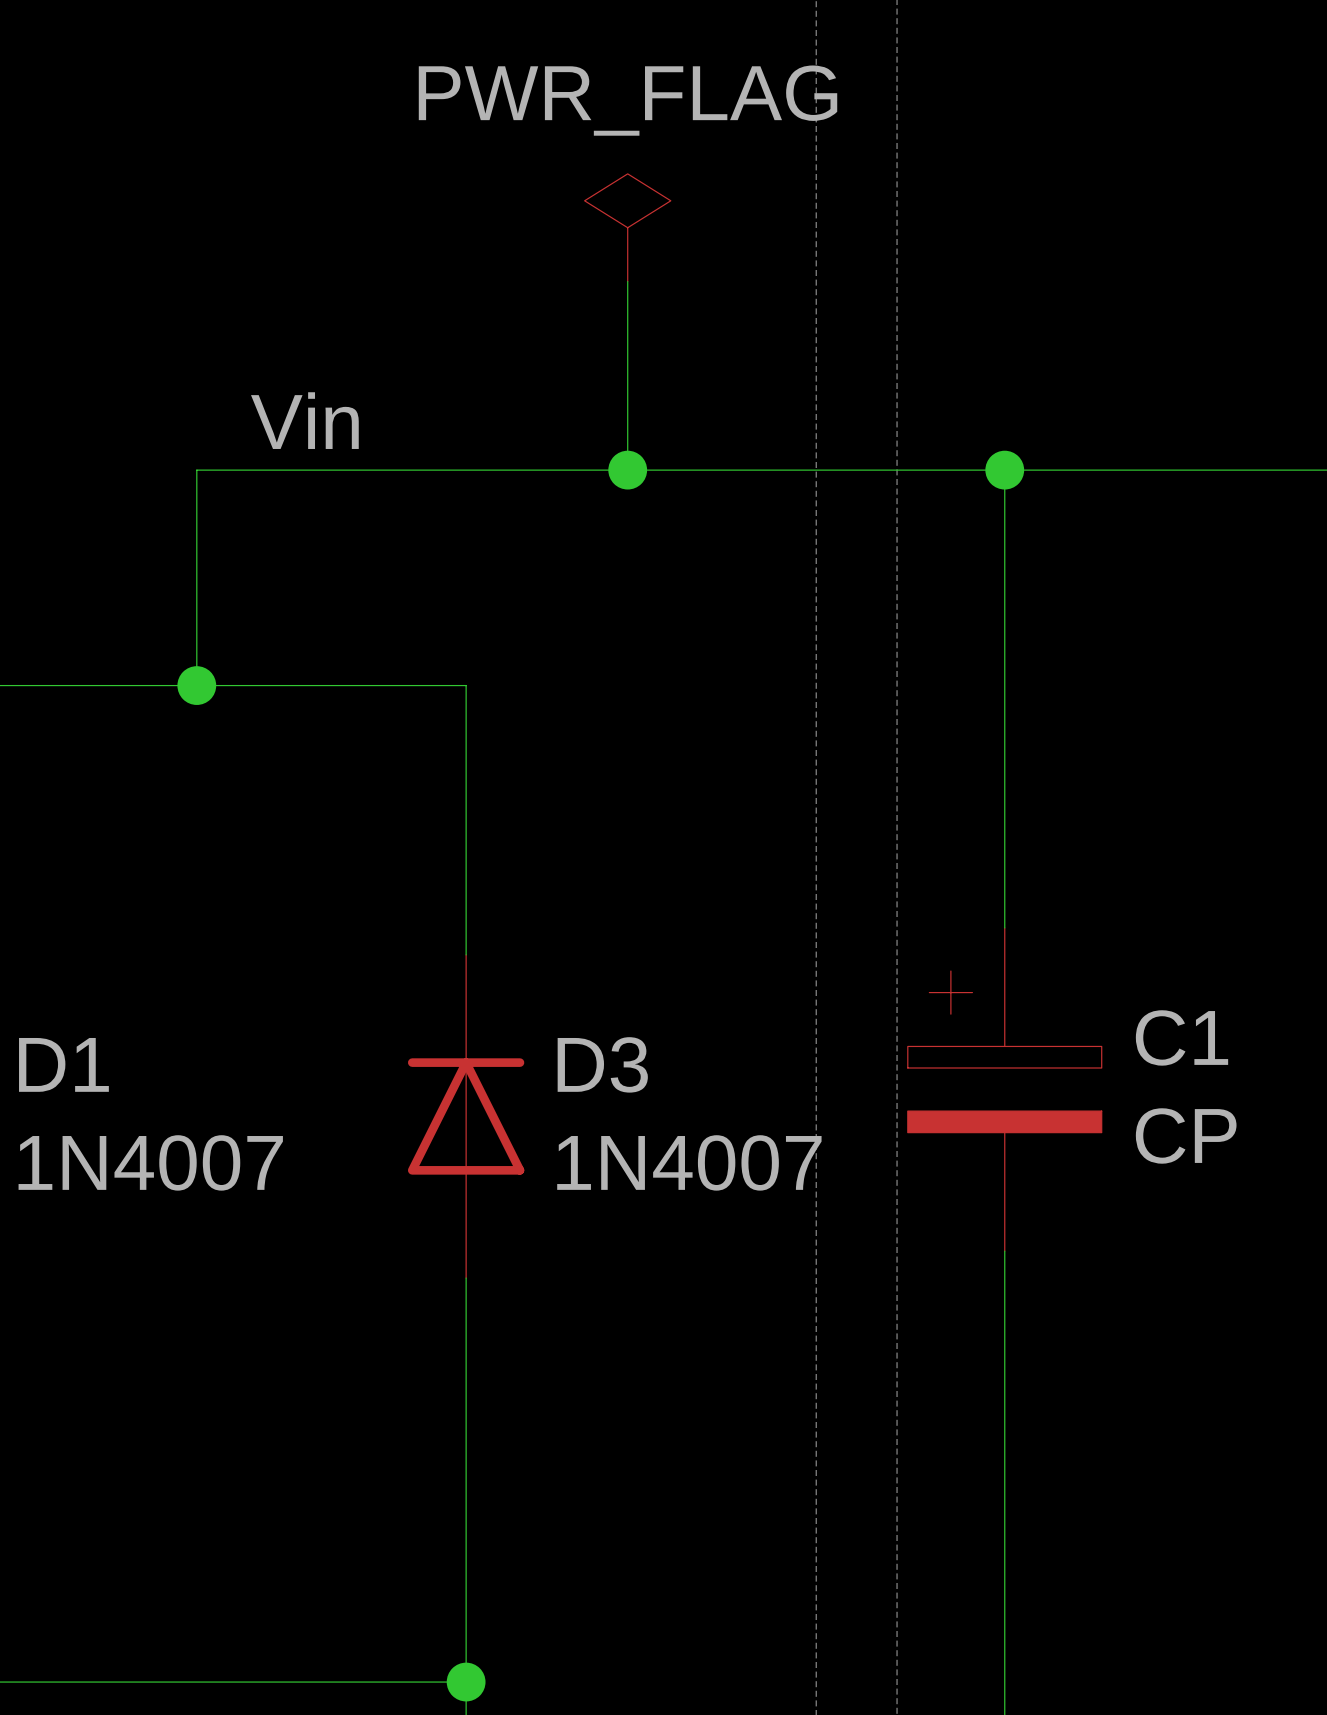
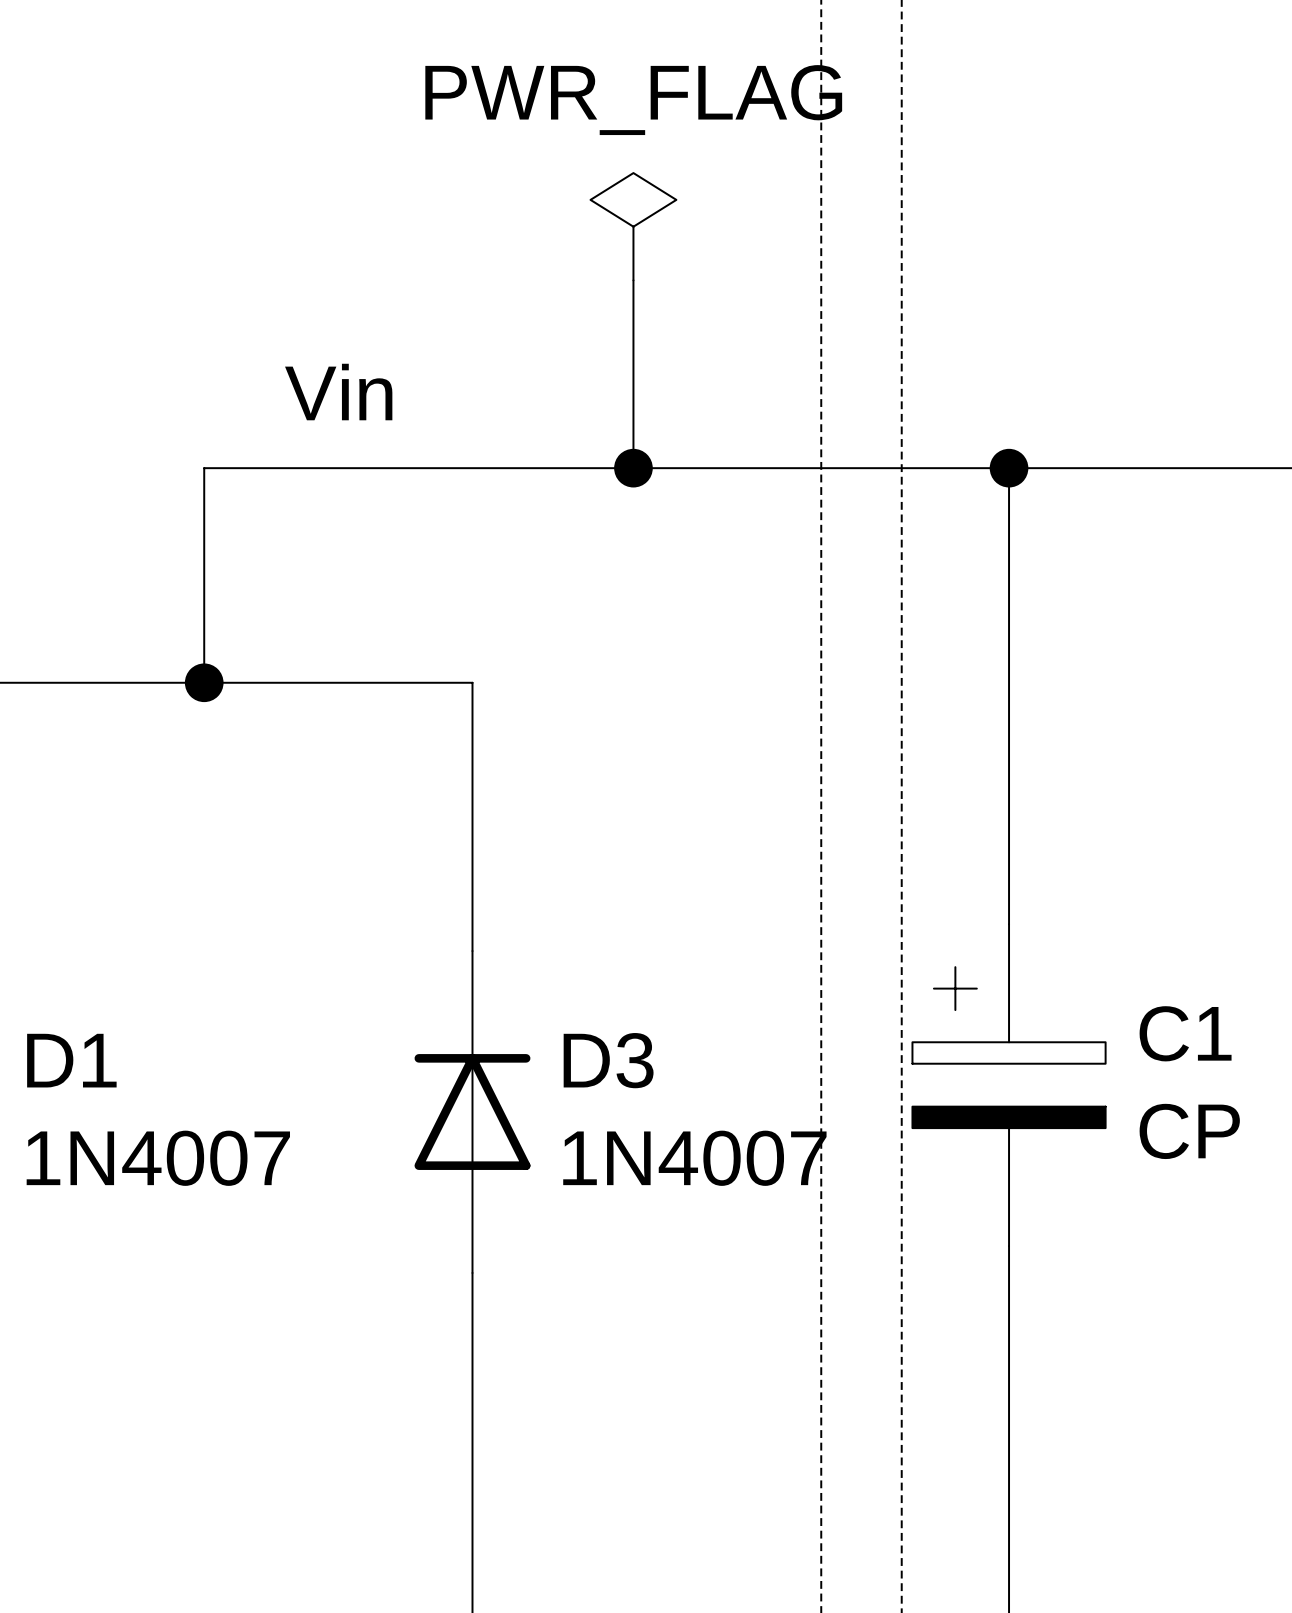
label position: Vin (304, 420) -> Vin (338, 392)

